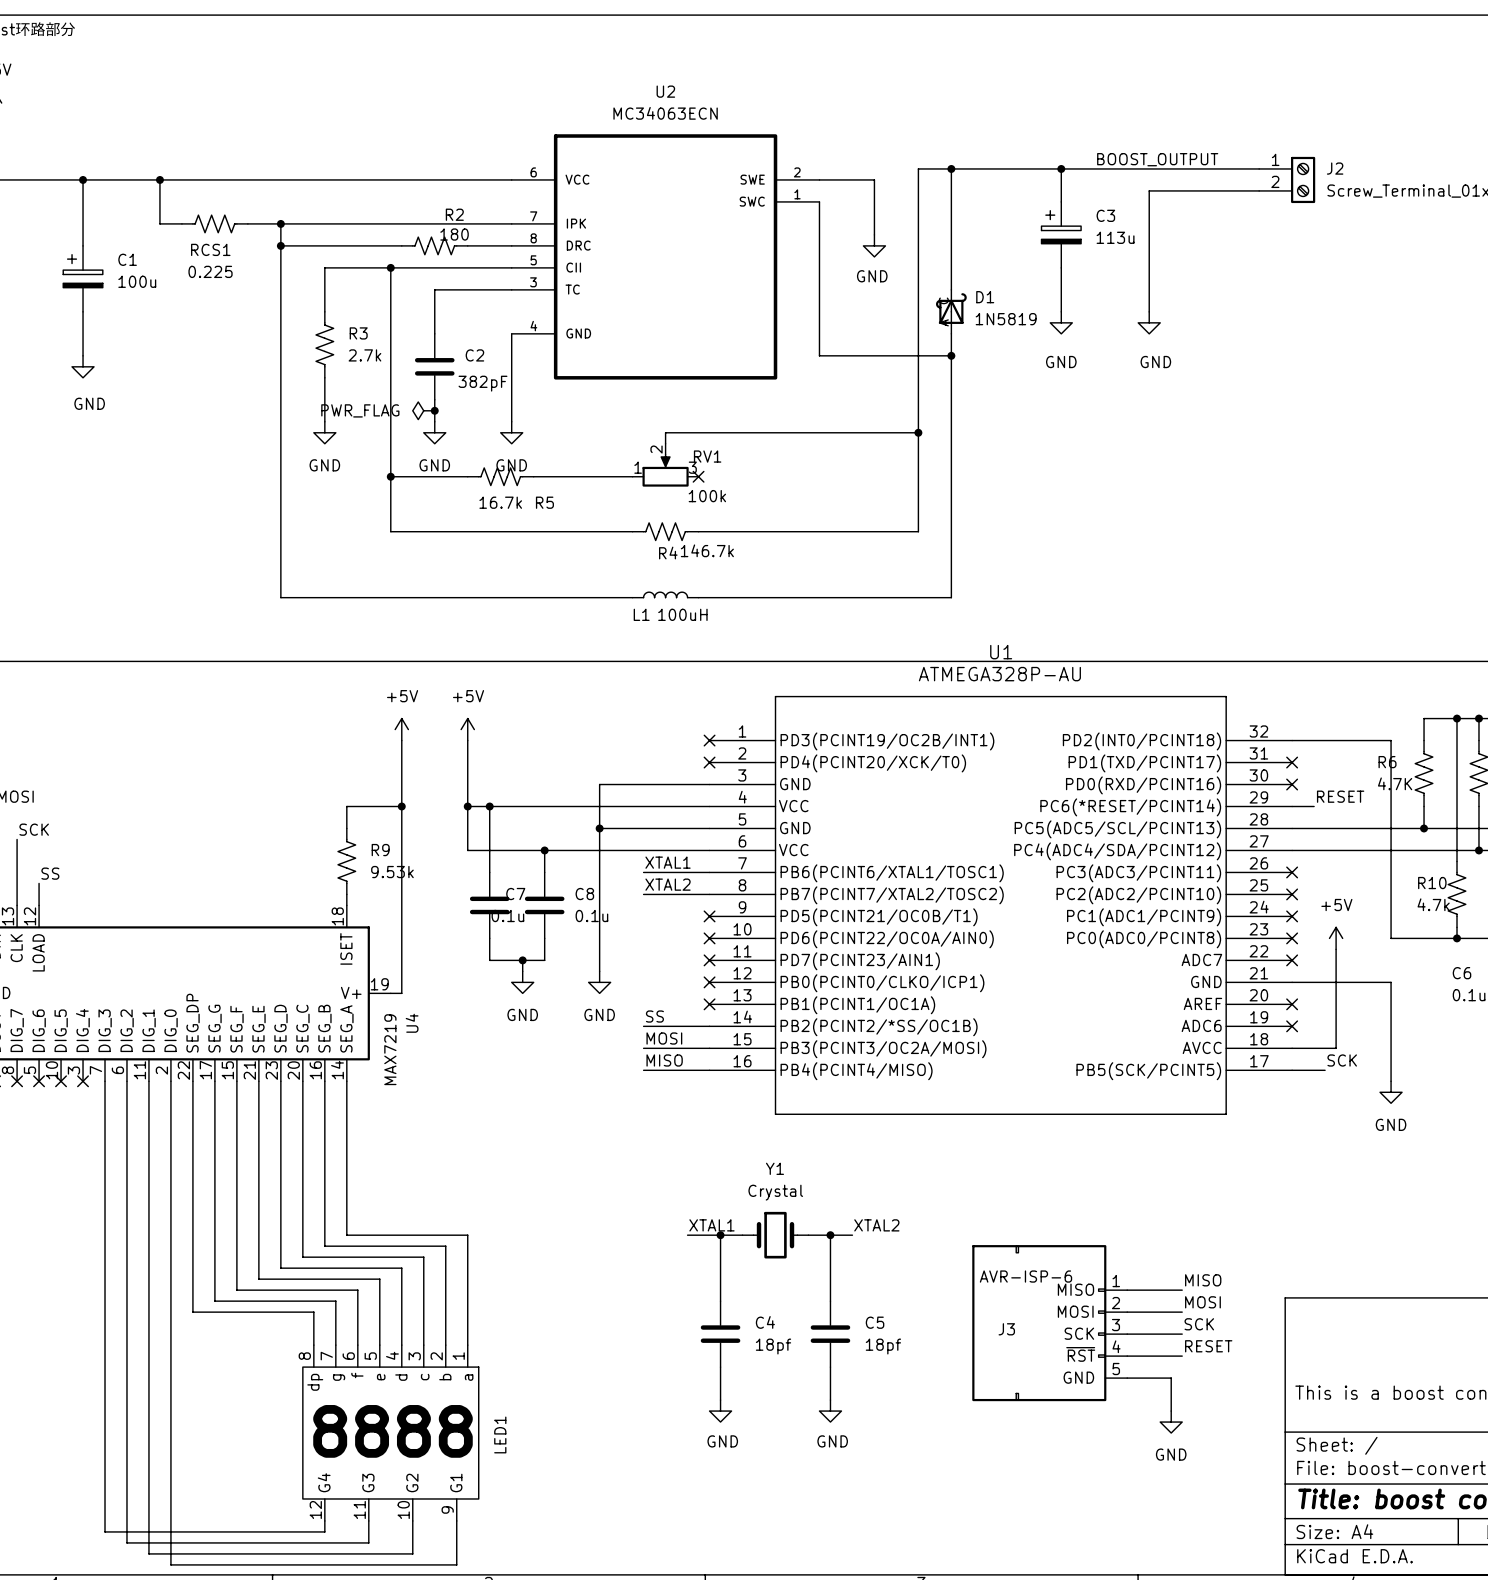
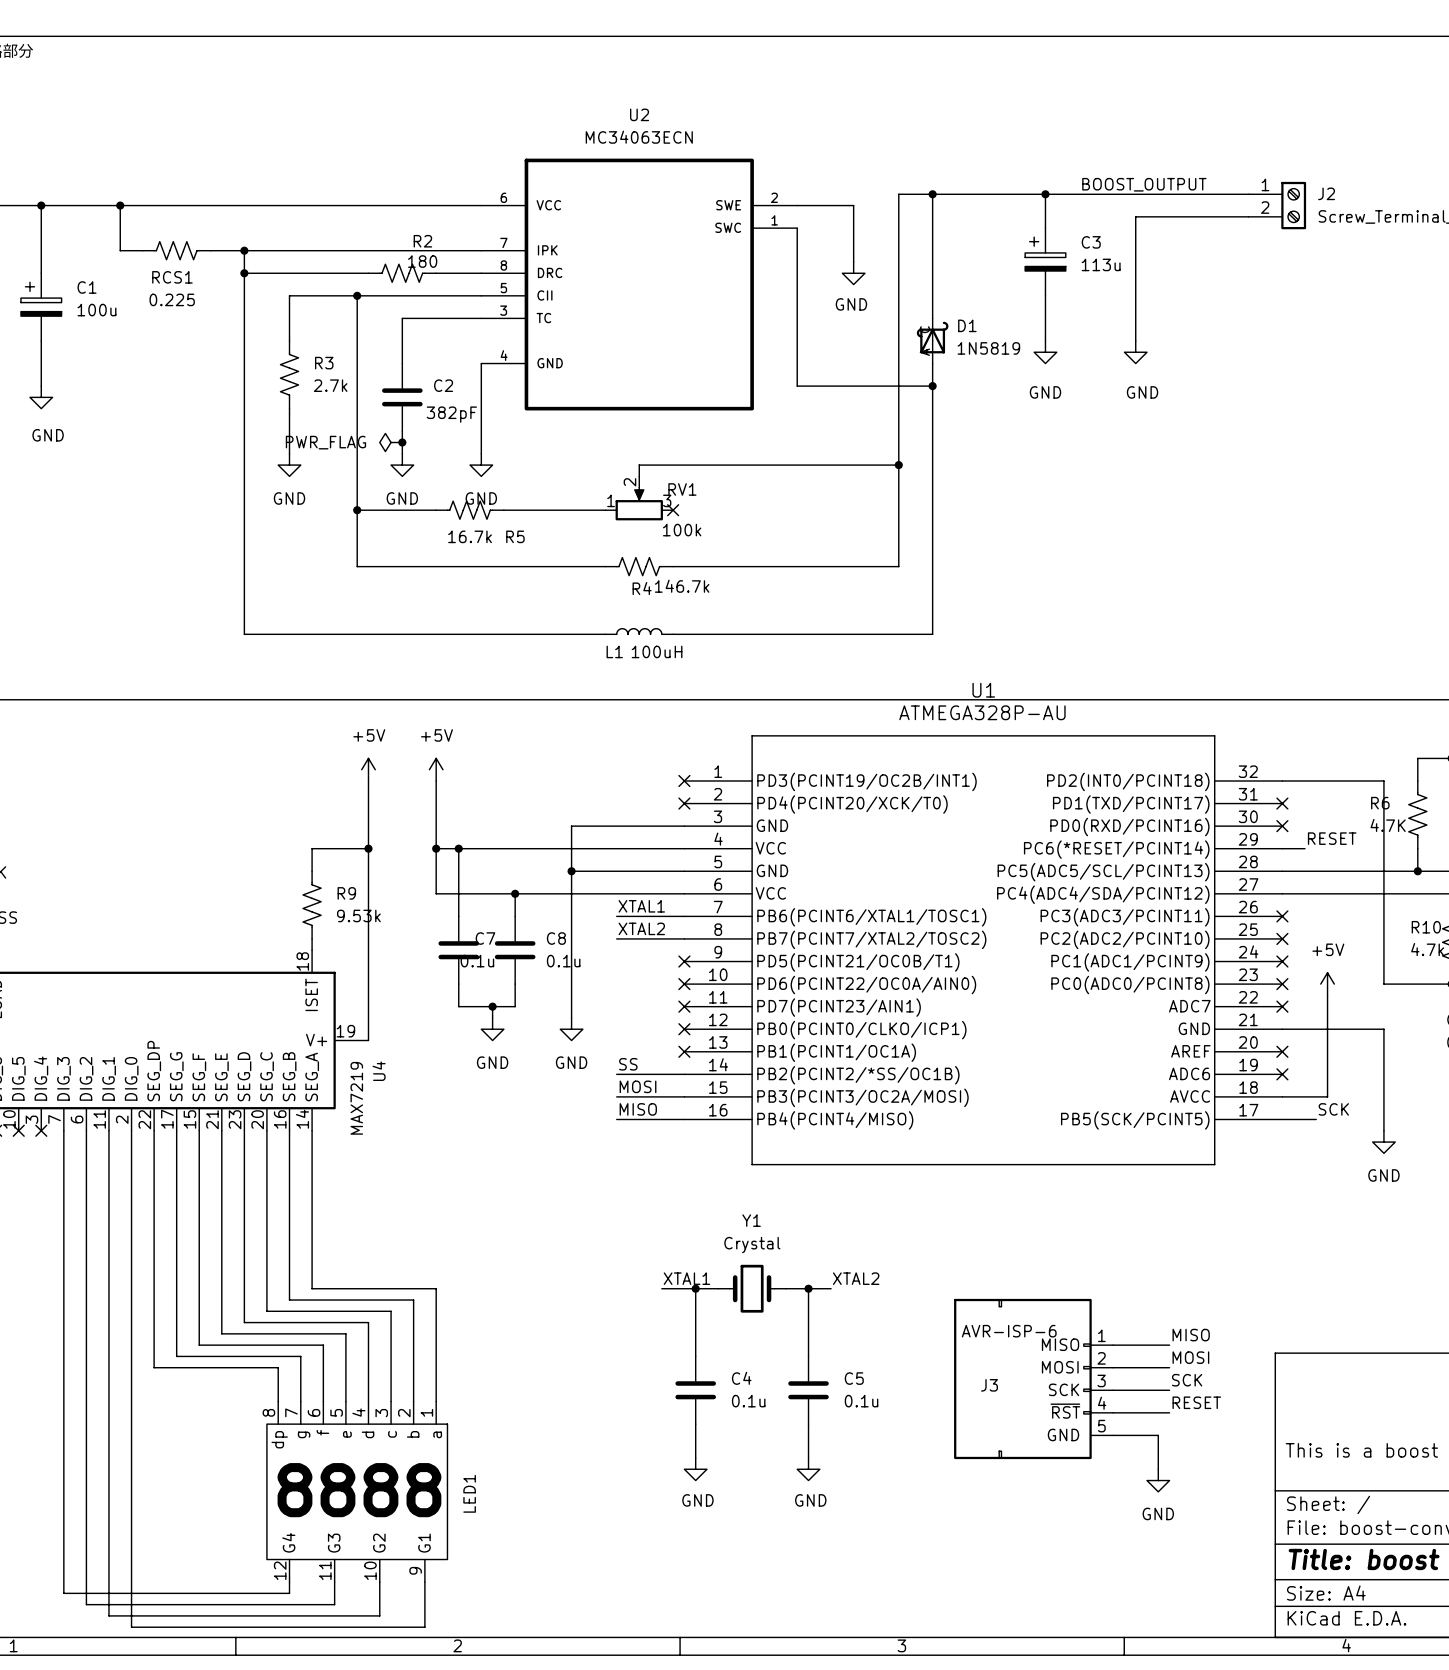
C4 value: 18pf (773, 1346) -> 0.1u (748, 1401)
C5 value: 18pf (883, 1346) -> 0.1u (861, 1401)

